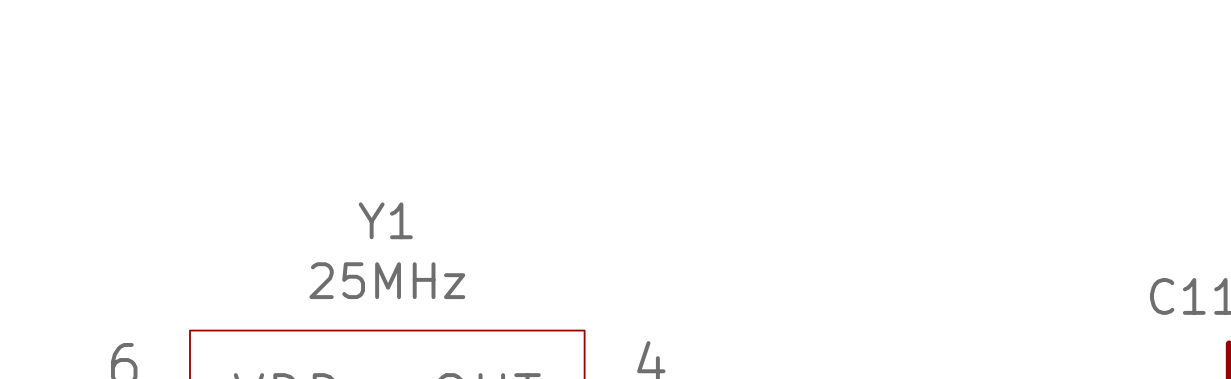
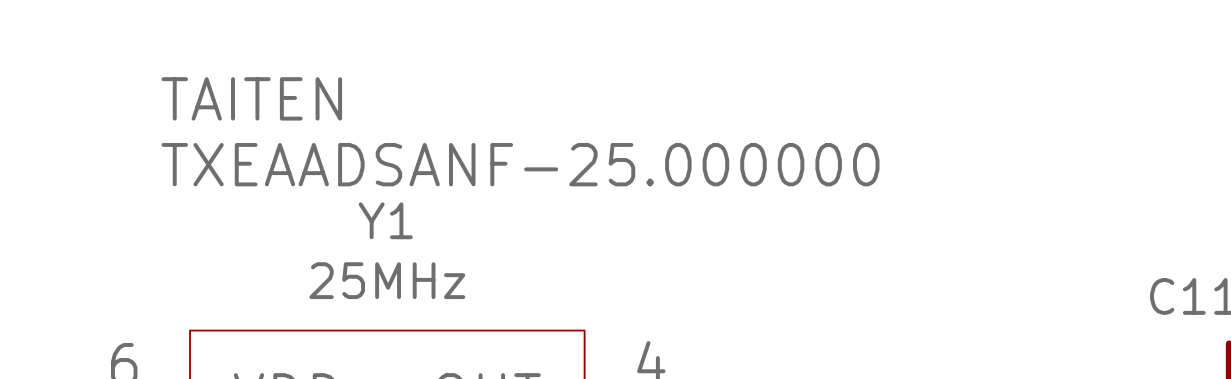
Y1 text: none -> TAITEN (251, 98)
Y1 text: none -> TXEAADSANF-25.000000 (520, 164)

